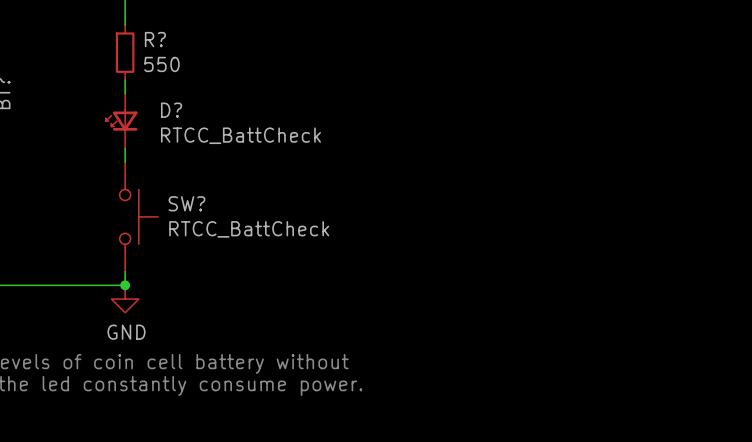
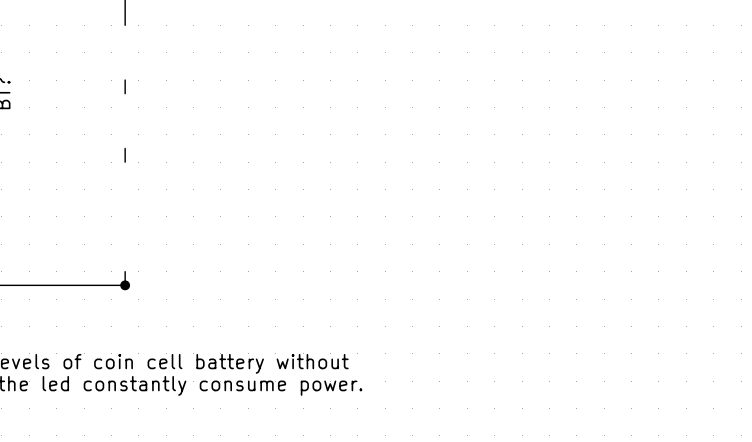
R?: 550 (125, 52) -> none
D?: RTCC_BattCheck (121, 121) -> none
SW?: RTCC_BattCheck (138, 216) -> none
power symbol: GND (125, 299) -> none

